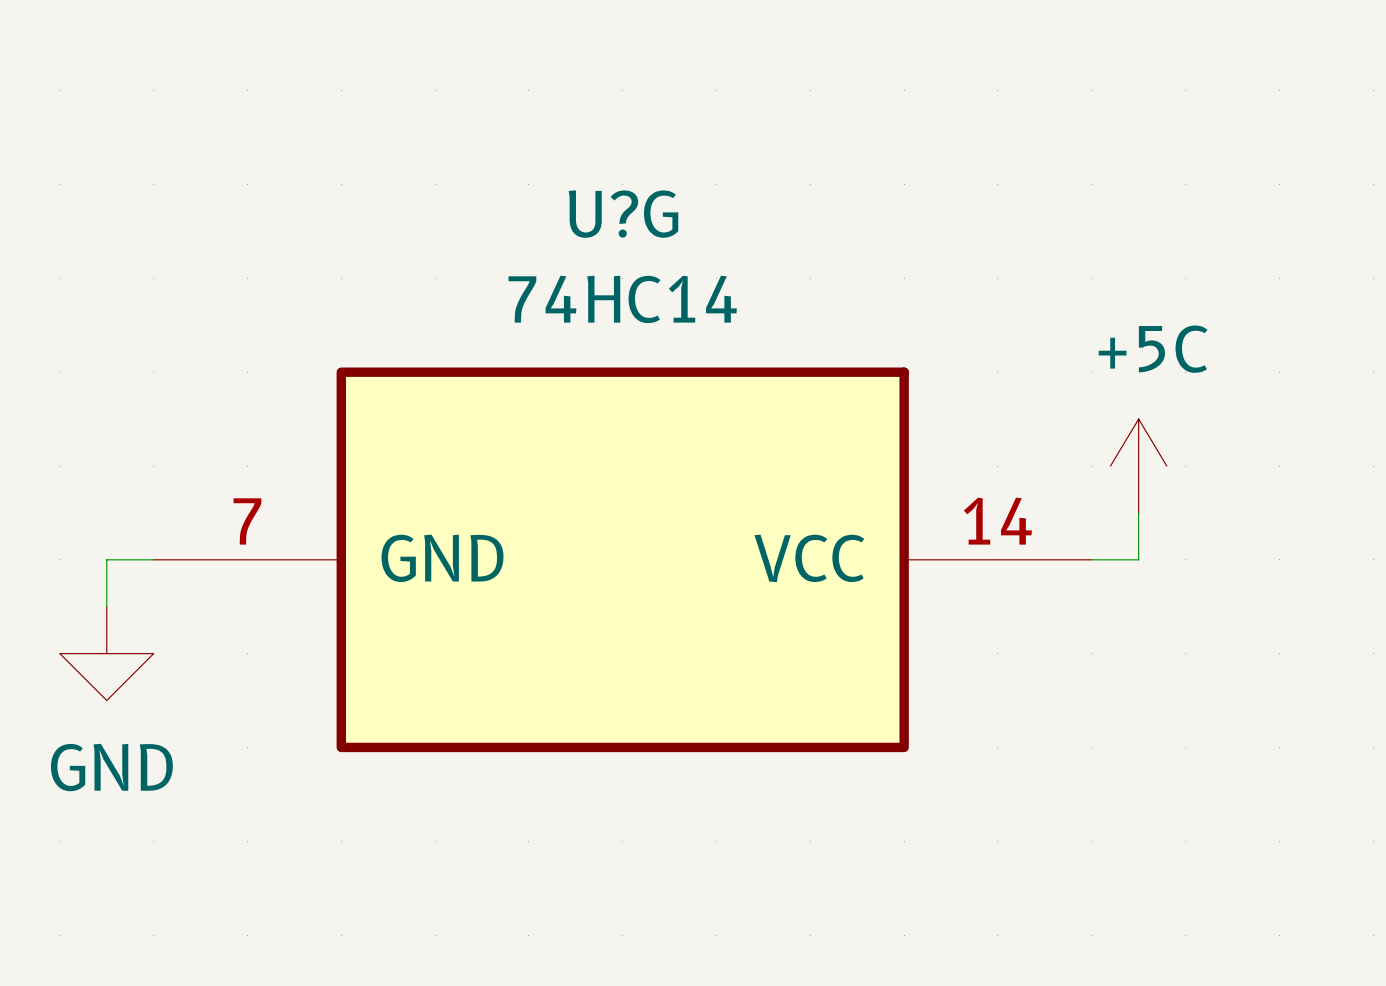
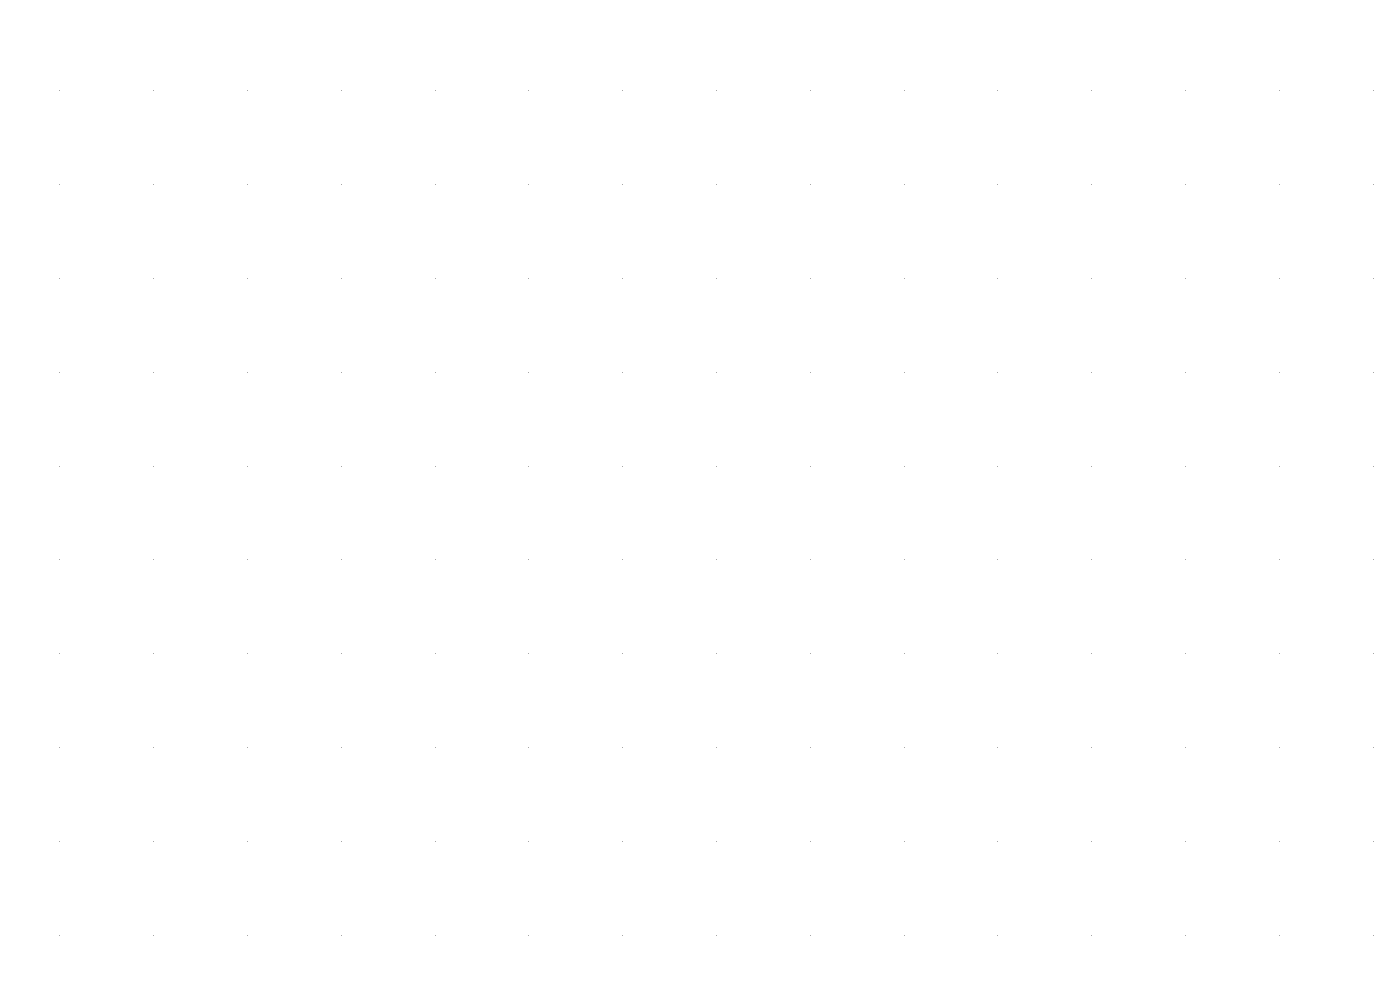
power symbol: +5C (1138, 466) -> none
wire: (1138, 512) (1138, 559) (1091, 559) -> none
wire: (153, 559) (106, 559) (106, 606) -> none
U?G: 74HC14 (622, 559) -> none
power symbol: GND (106, 653) -> none

